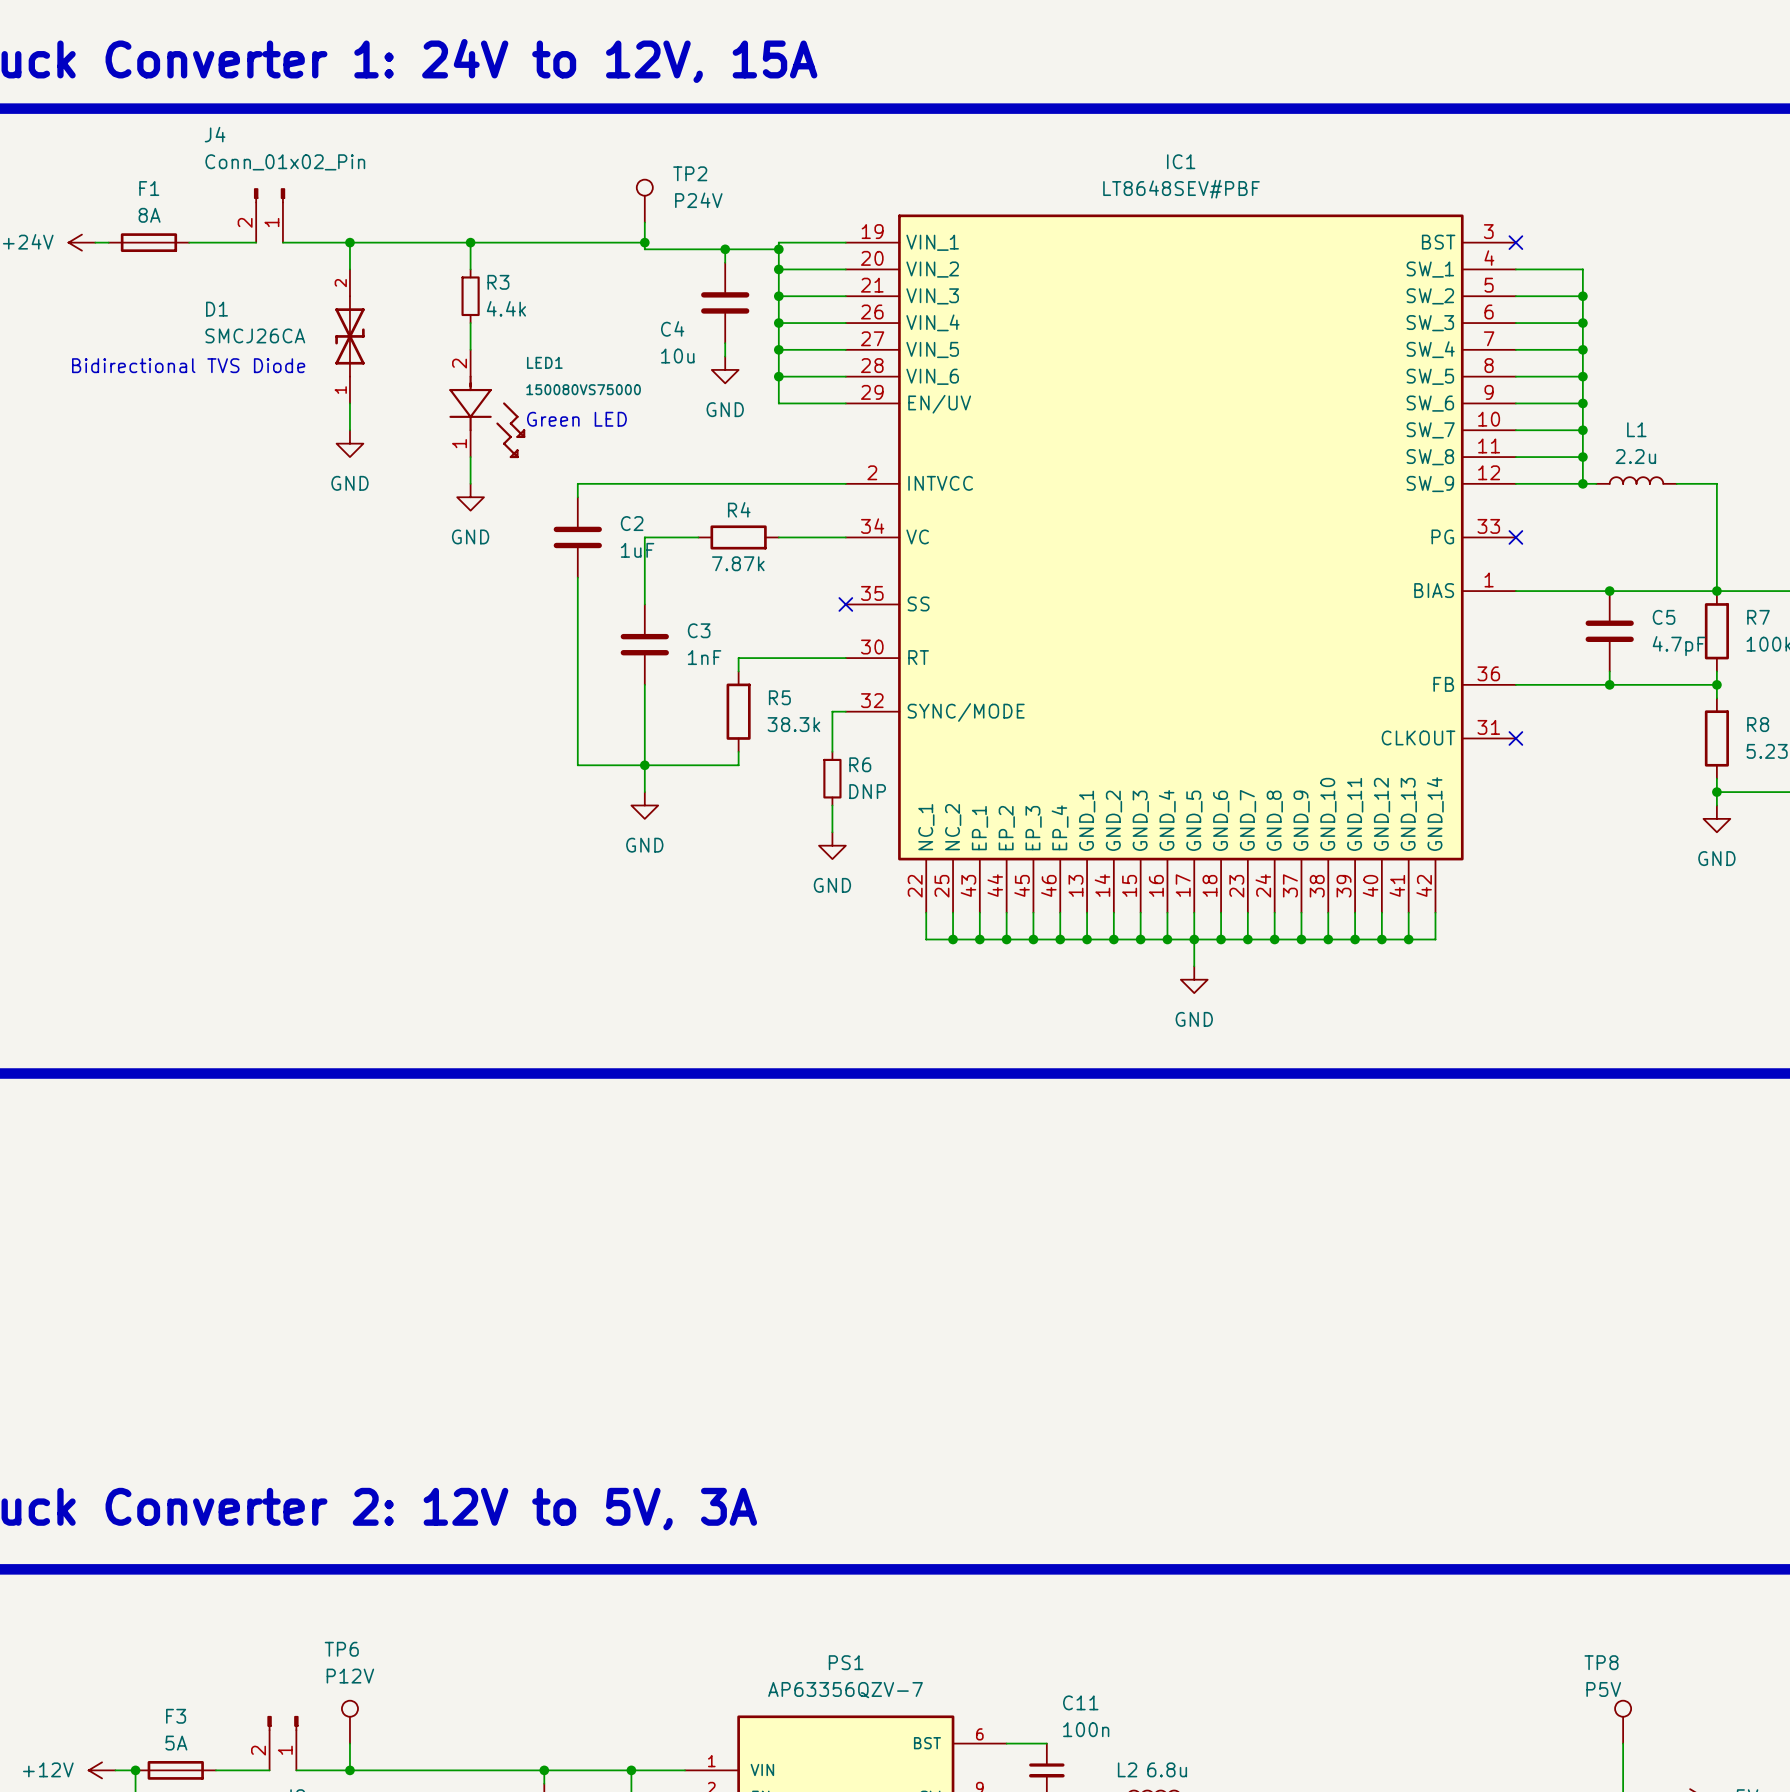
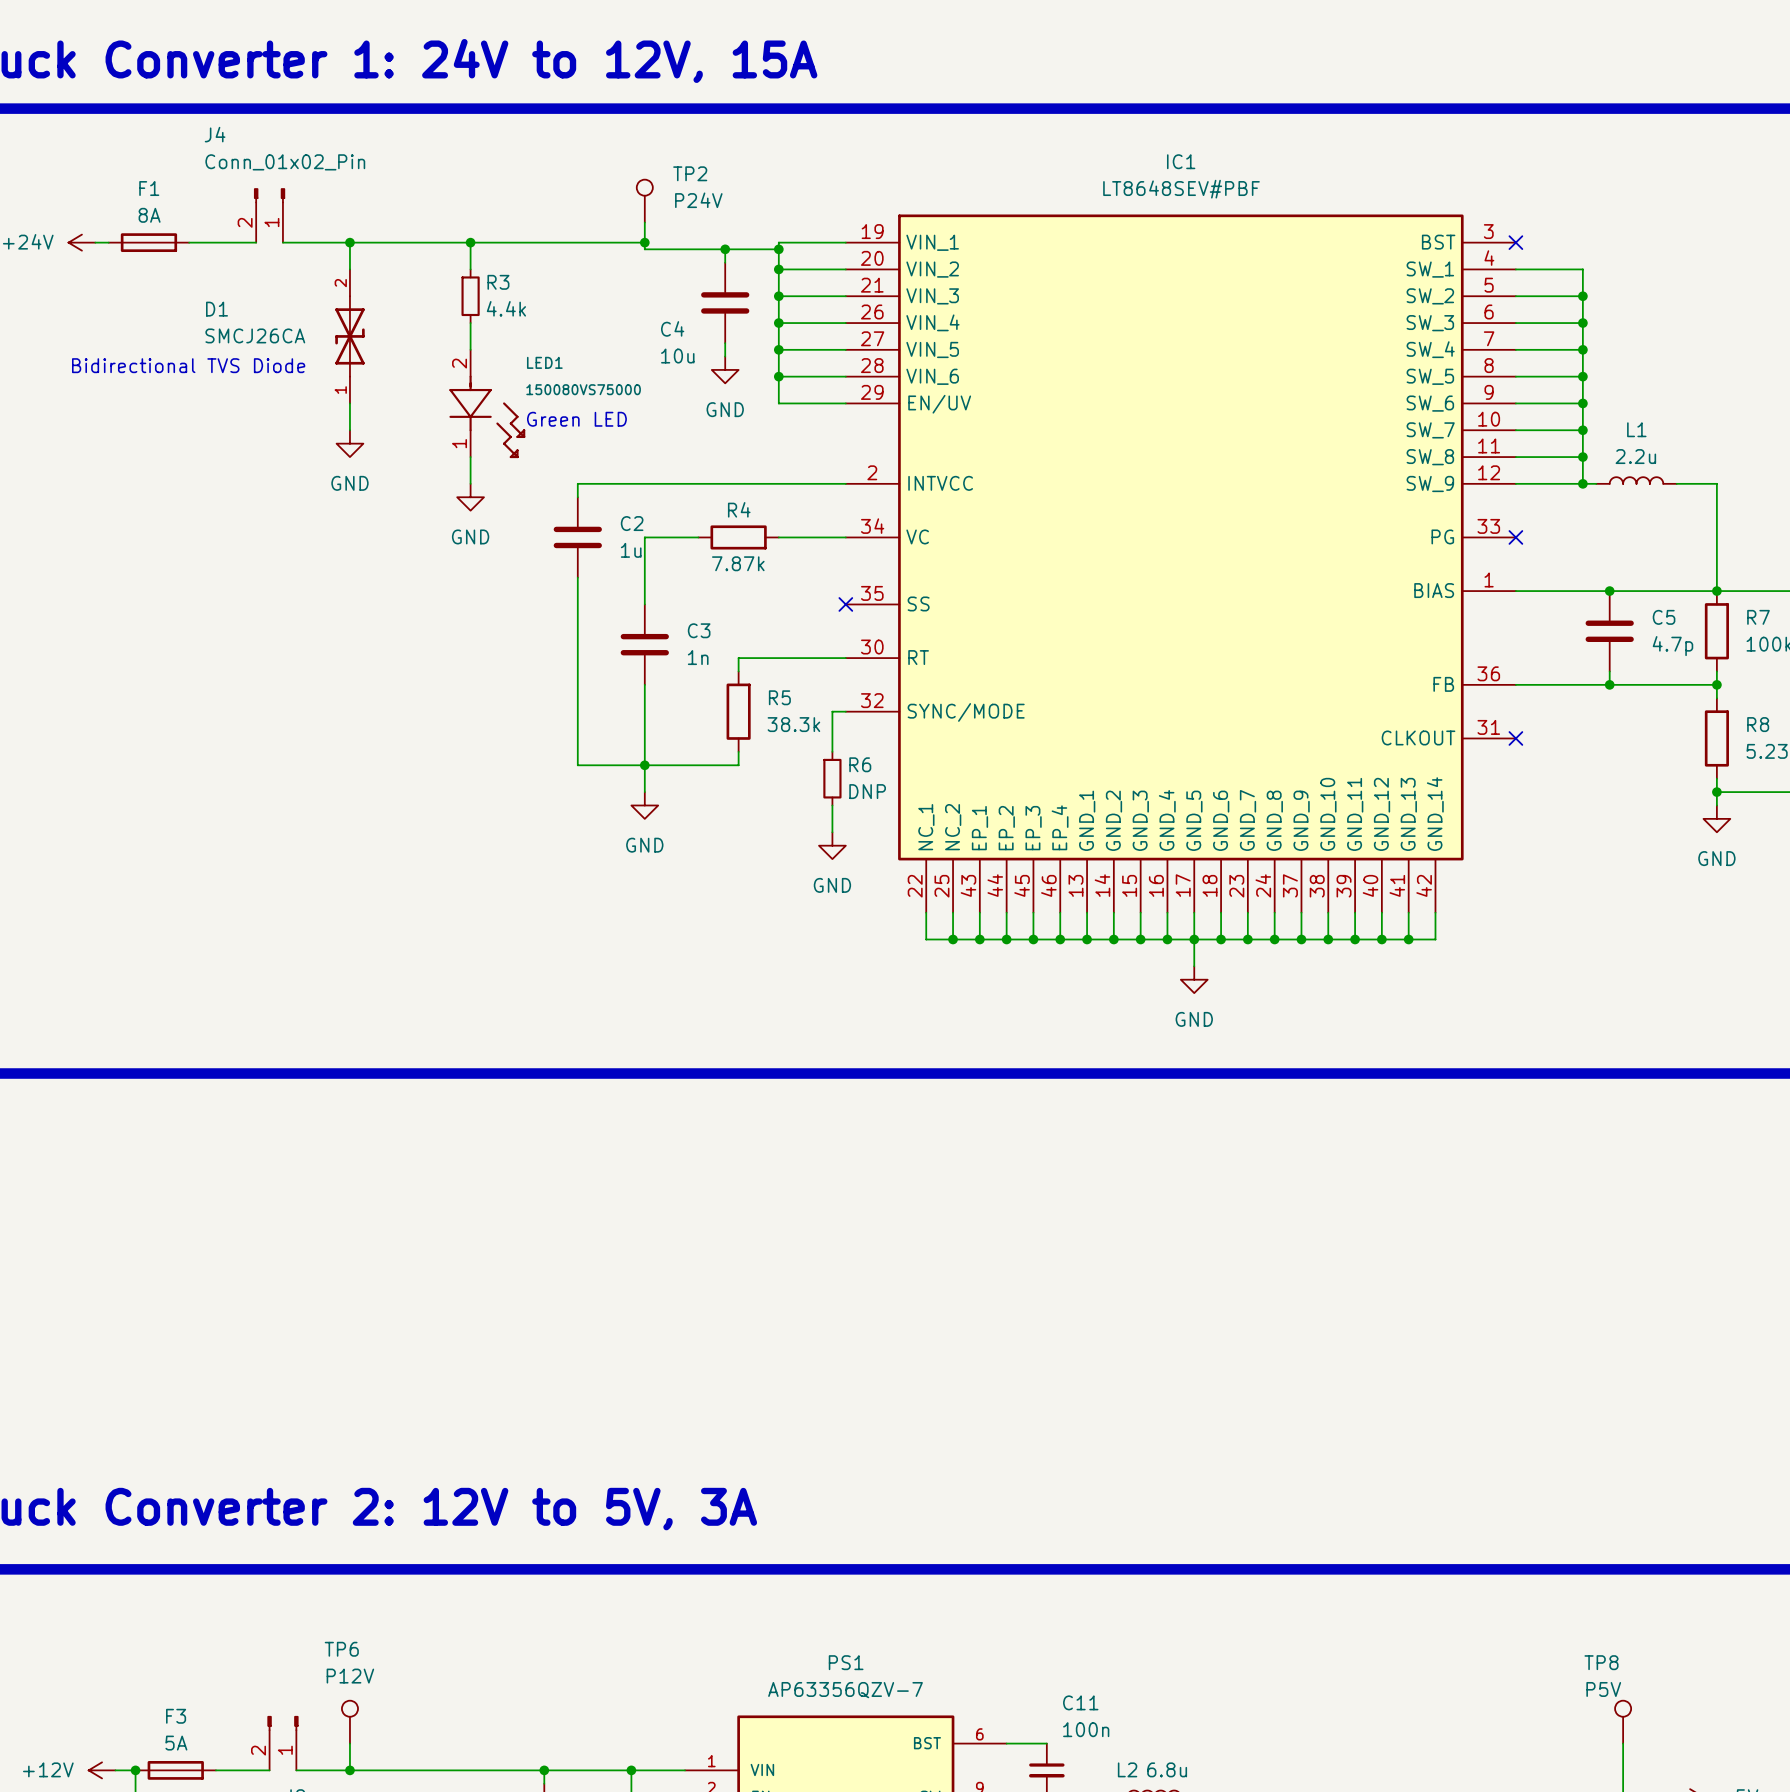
C2 value: 1uF (637, 550) -> 1u (631, 550)
C5 value: 4.7pF (1679, 646) -> 4.7p (1672, 646)
C3 value: 1nF (704, 657) -> 1n (698, 657)

